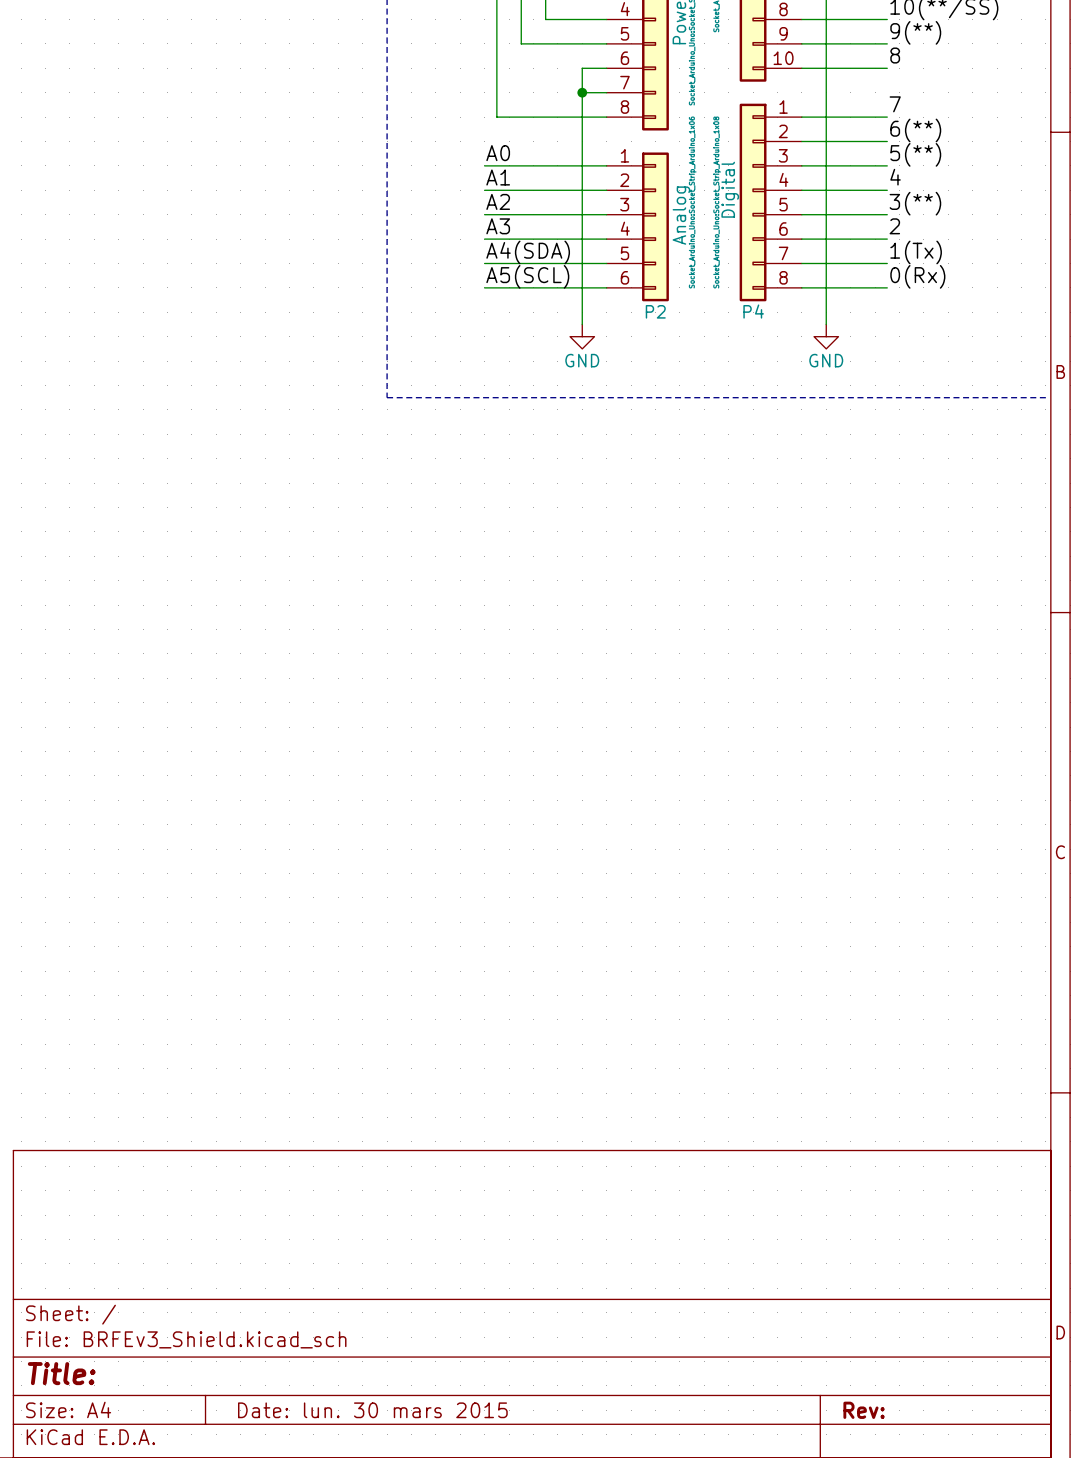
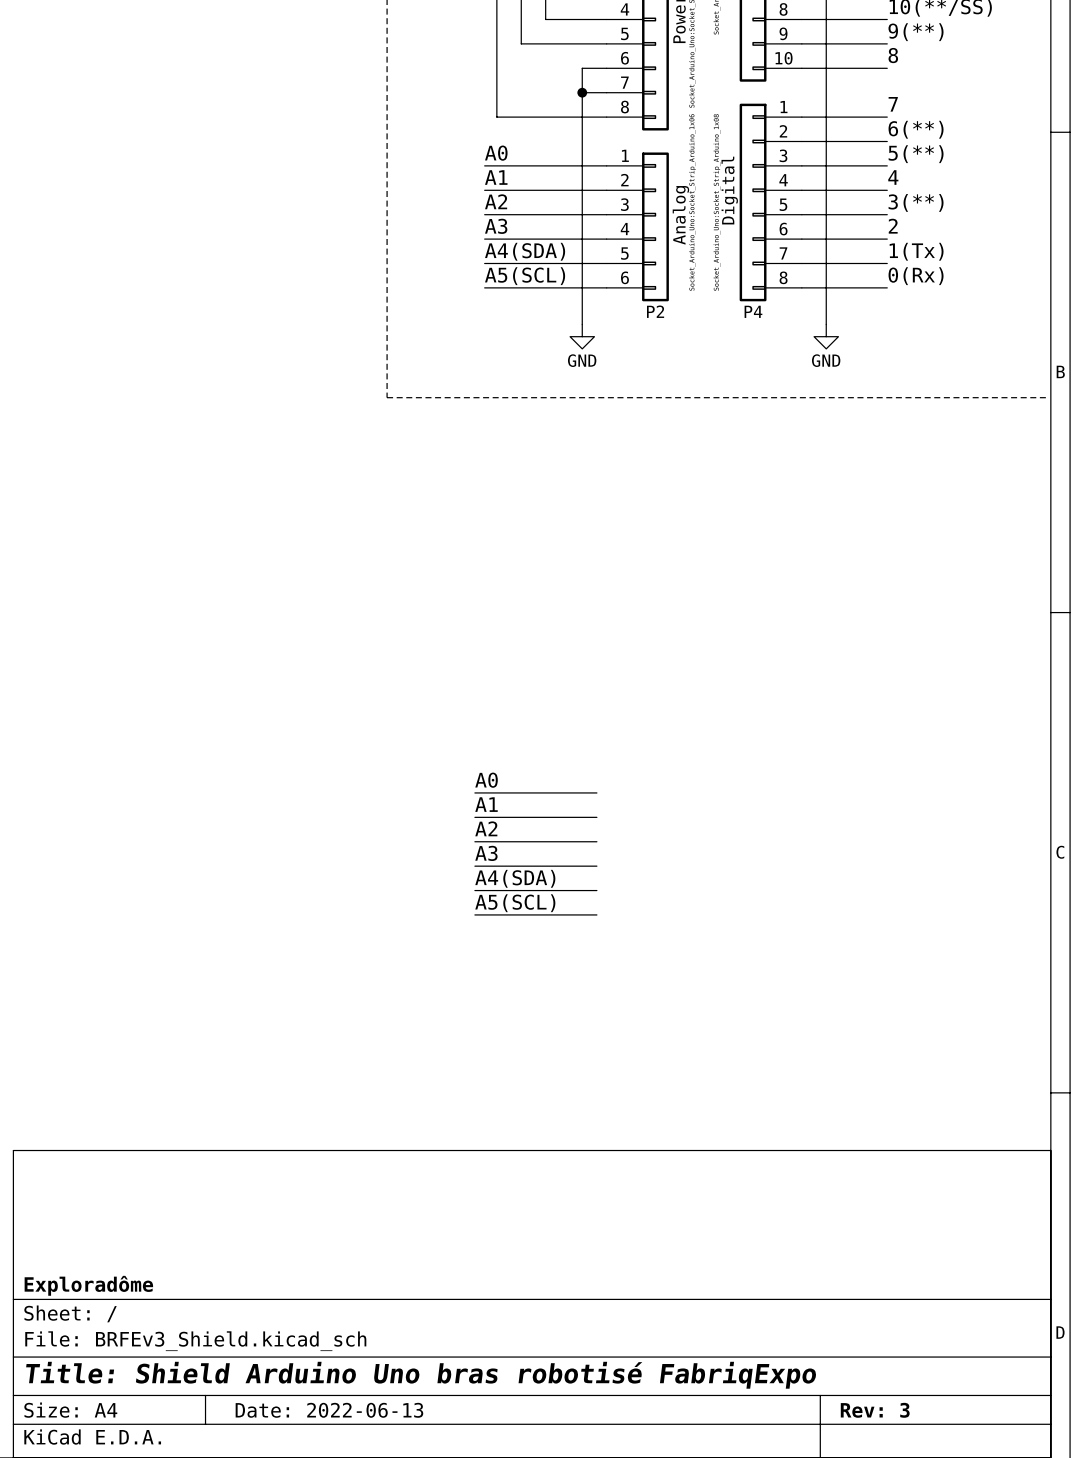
label: none -> A0 (486, 780)
wire: none -> (474, 792) (596, 792)
label: none -> A1 (486, 804)
wire: none -> (474, 817) (596, 817)
label: none -> A2 (486, 828)
wire: none -> (474, 841) (596, 841)
label: none -> A3 (486, 853)
wire: none -> (474, 866) (596, 866)
label: none -> A4(SDA) (515, 878)
wire: none -> (474, 890) (596, 890)
label: none -> A5(SCL) (515, 903)
wire: none -> (474, 914) (596, 914)
title block: none -> Exploradôme (88, 1285)
title block: Title: (61, 1373) -> Title: Shield Arduino Uno bras robotisé FabriqExpo (421, 1375)
title block: Date: lun. 30 mars 2015 (372, 1410) -> Date: 2022-06-13 (329, 1410)
title block: Rev: (864, 1410) -> Rev: 3 (875, 1410)

